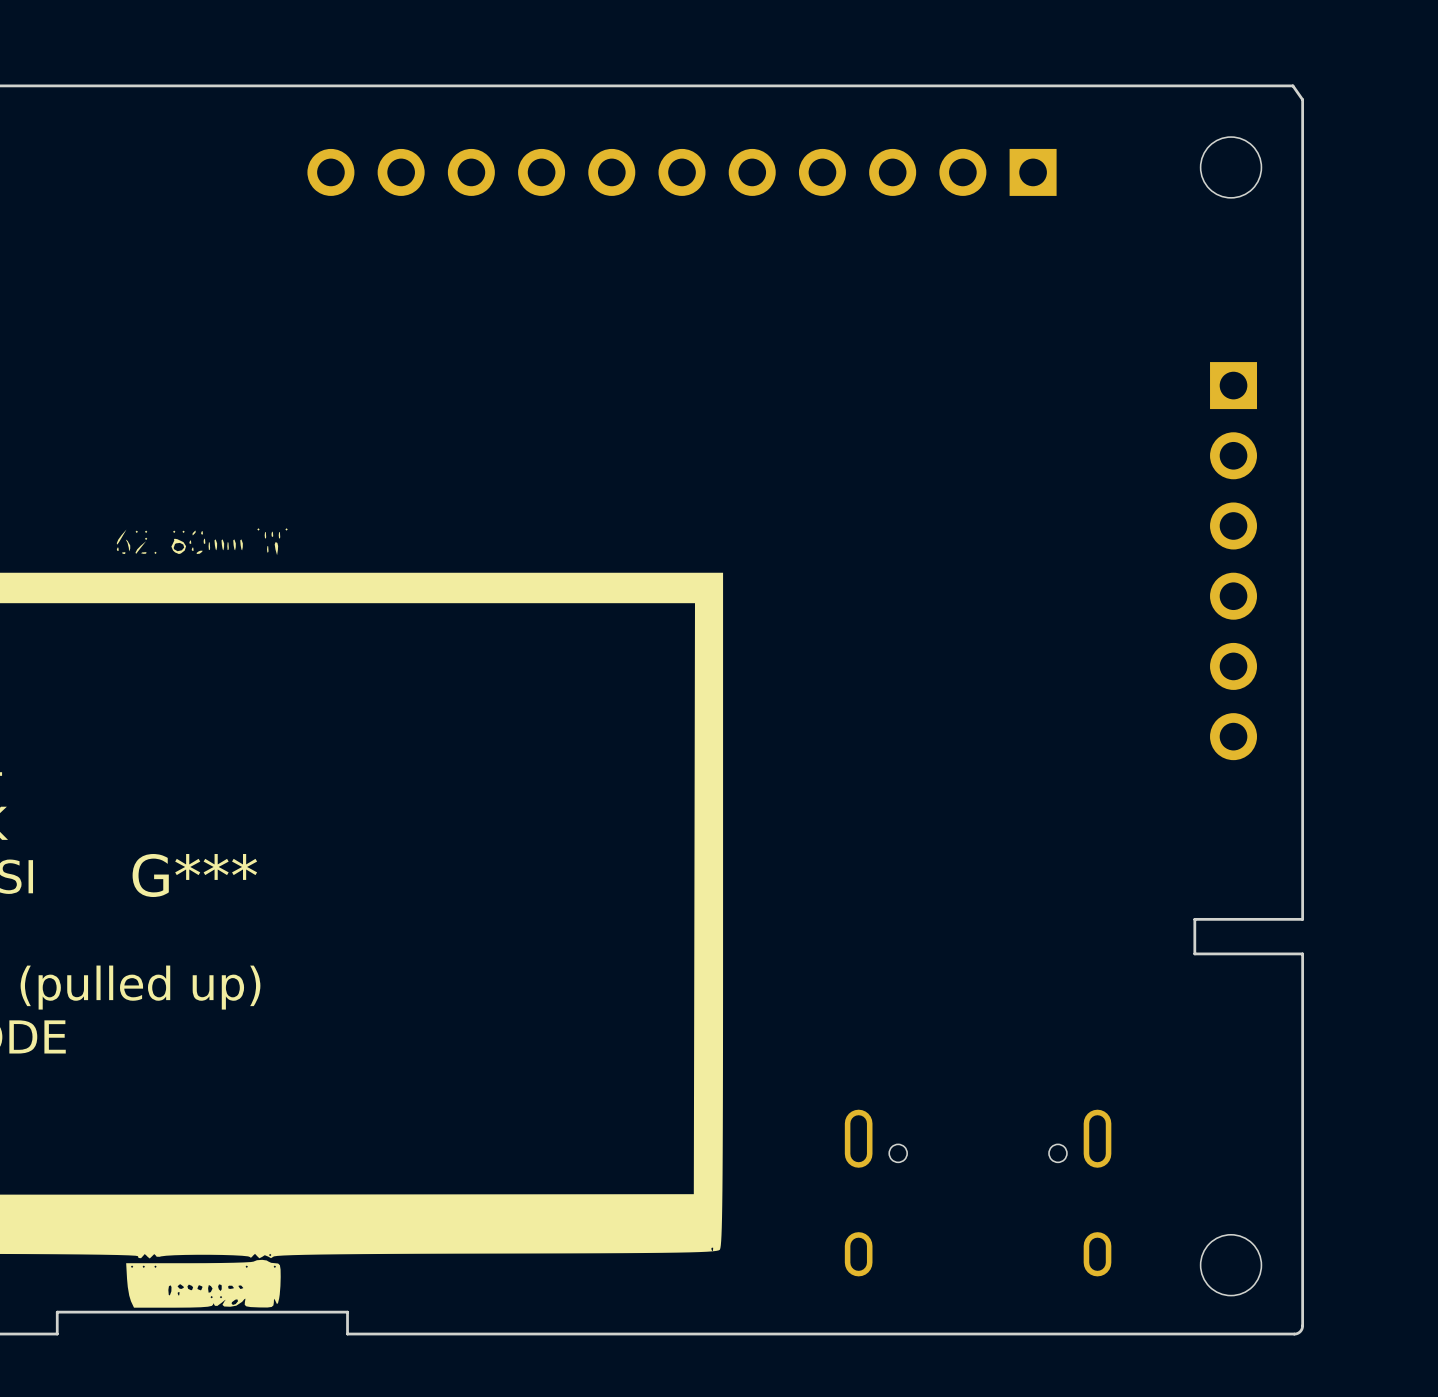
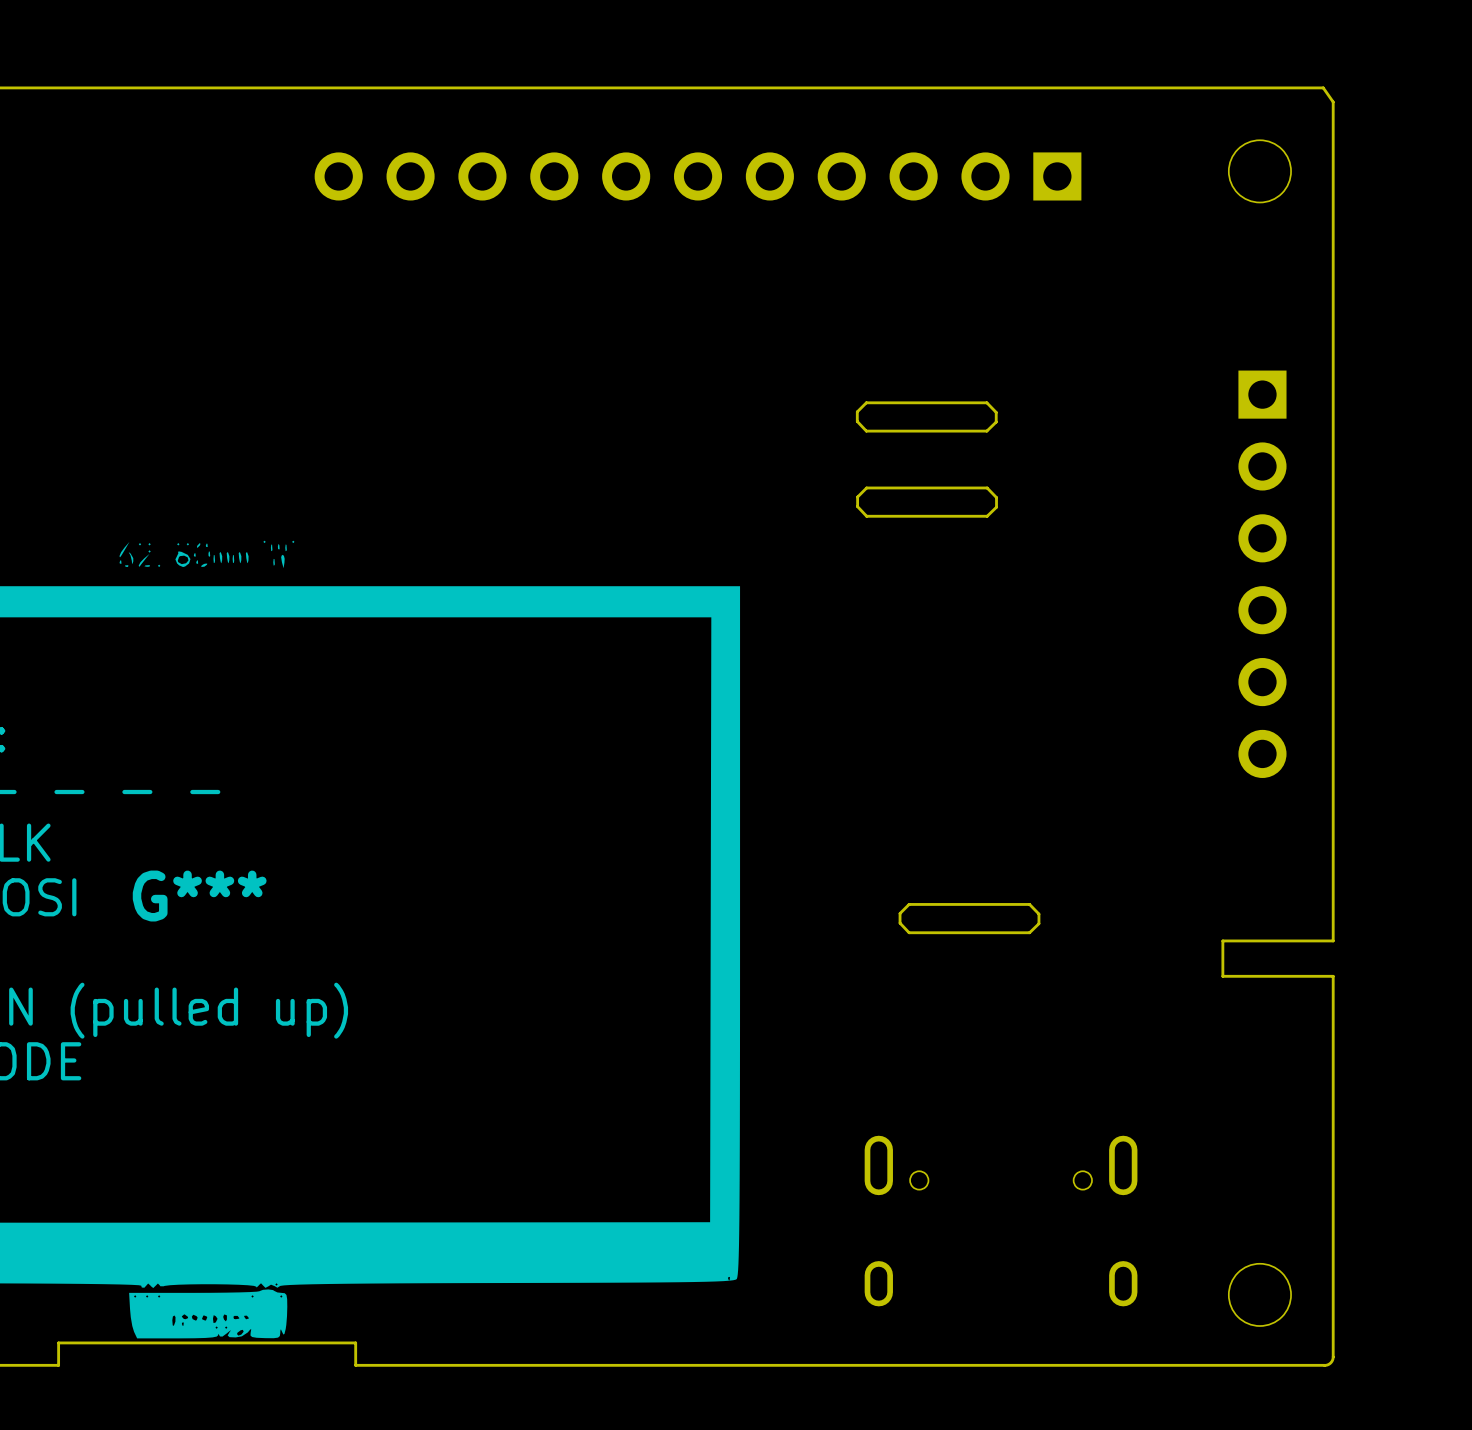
board edge: none -> (986, 402) (866, 402) (857, 411) (857, 421) (866, 431) (986, 431) (996, 422) (996, 412) (986, 402)
board edge: none -> (987, 487) (996, 497) (996, 507) (987, 516) (866, 516) (857, 506) (857, 497) (866, 487) (987, 487)
board edge: none -> (1029, 904) (1038, 914) (1038, 923) (1029, 932) (909, 932) (900, 923) (900, 913) (909, 904) (1029, 904)

